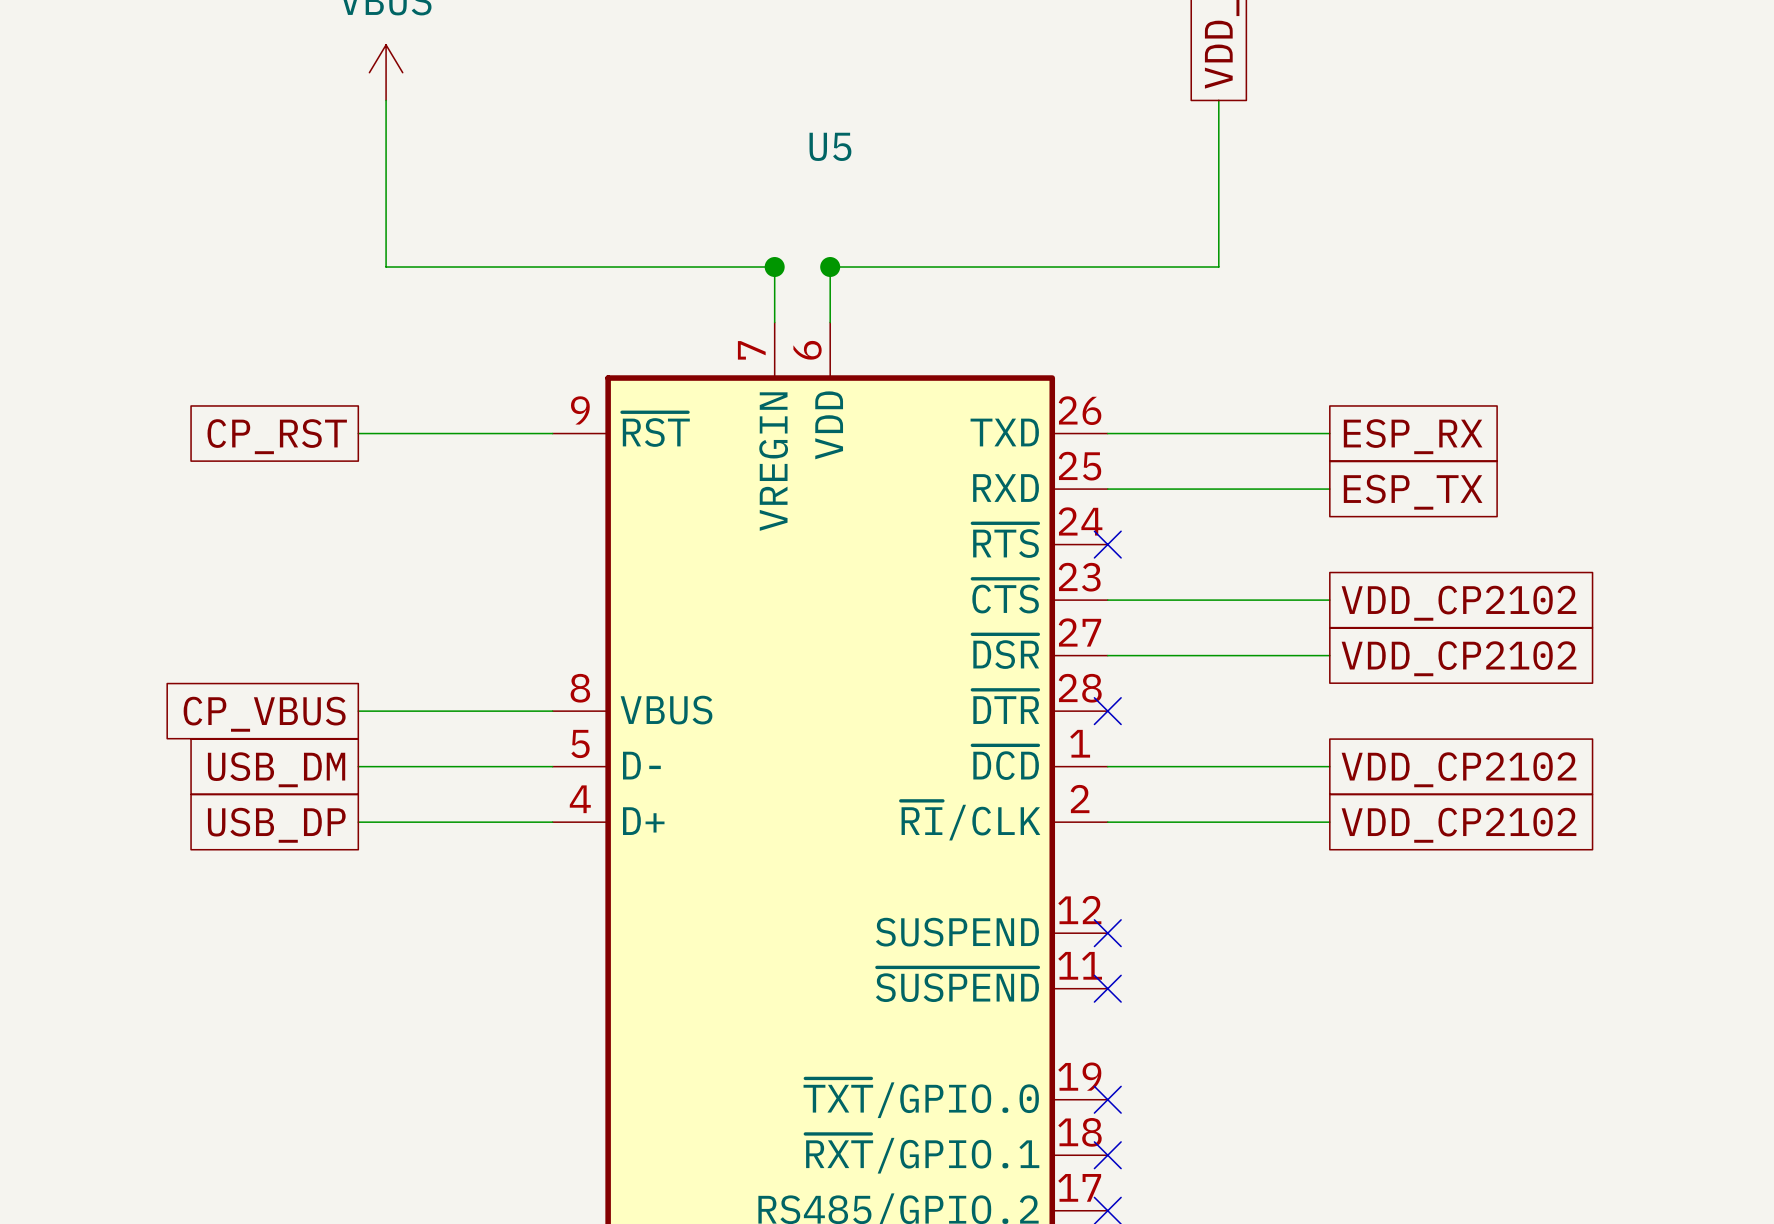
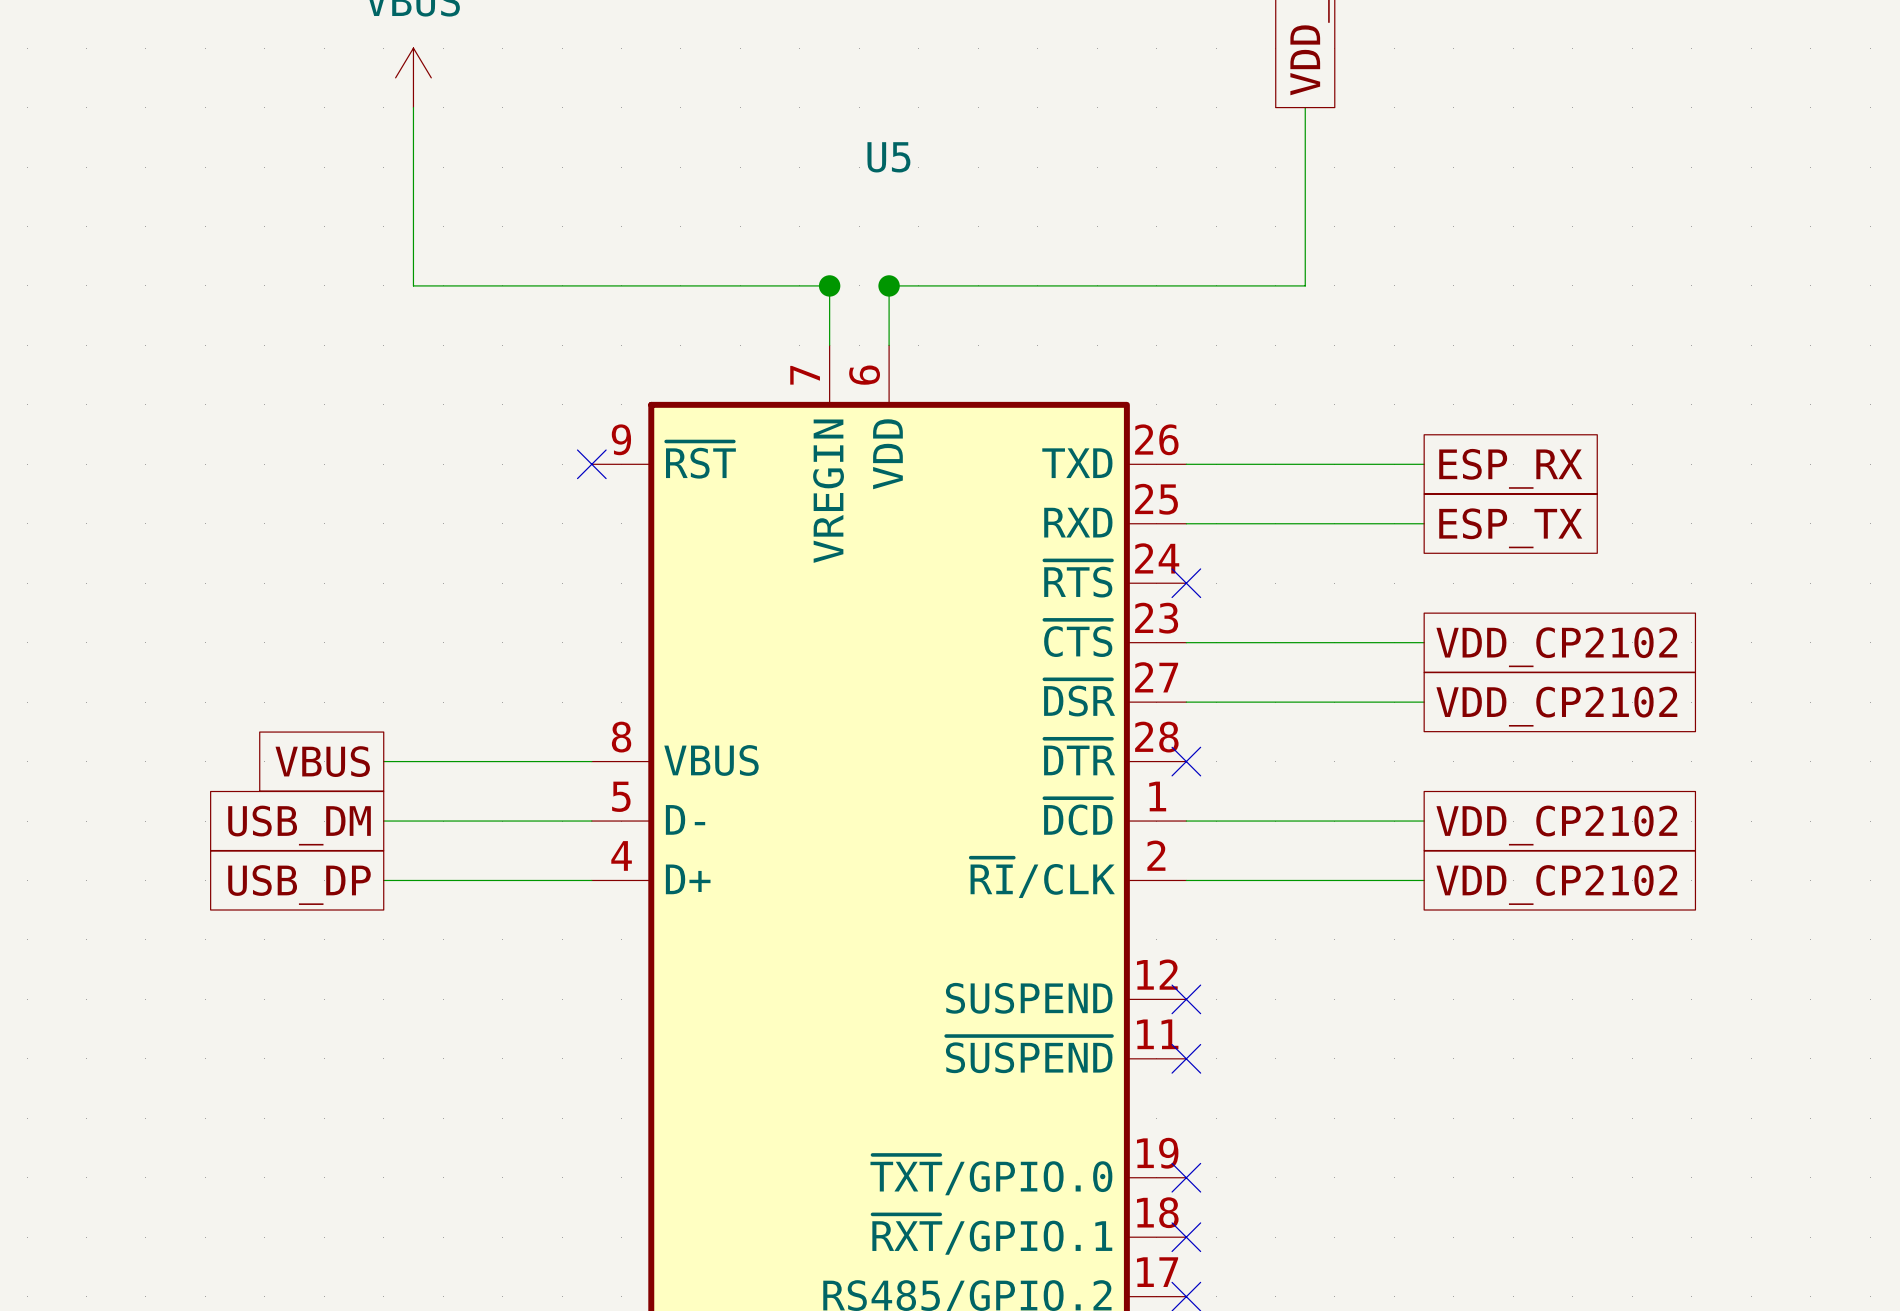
wire: (358, 433) (552, 433) -> none
no-connect mark: none -> (591, 464)
global label: CP_RST (277, 436) -> none
global label: CP_VBUS (264, 714) -> VBUS (322, 761)

